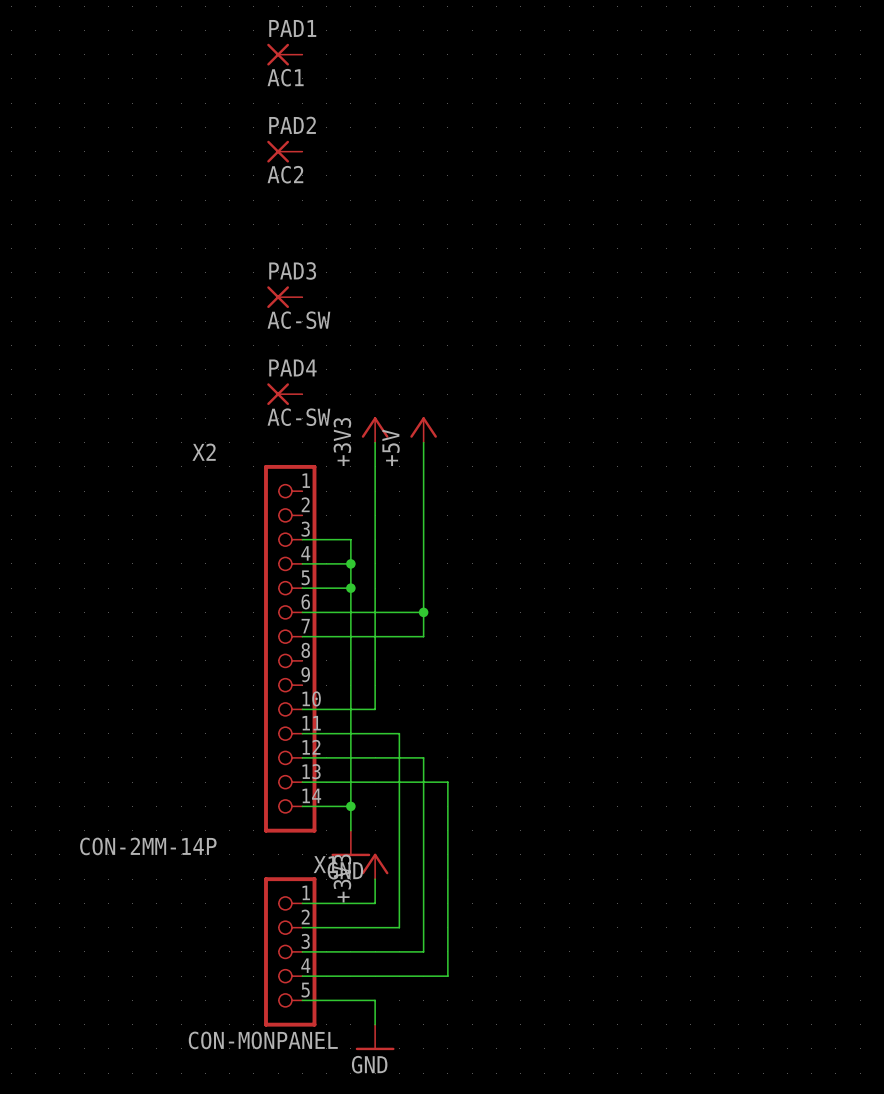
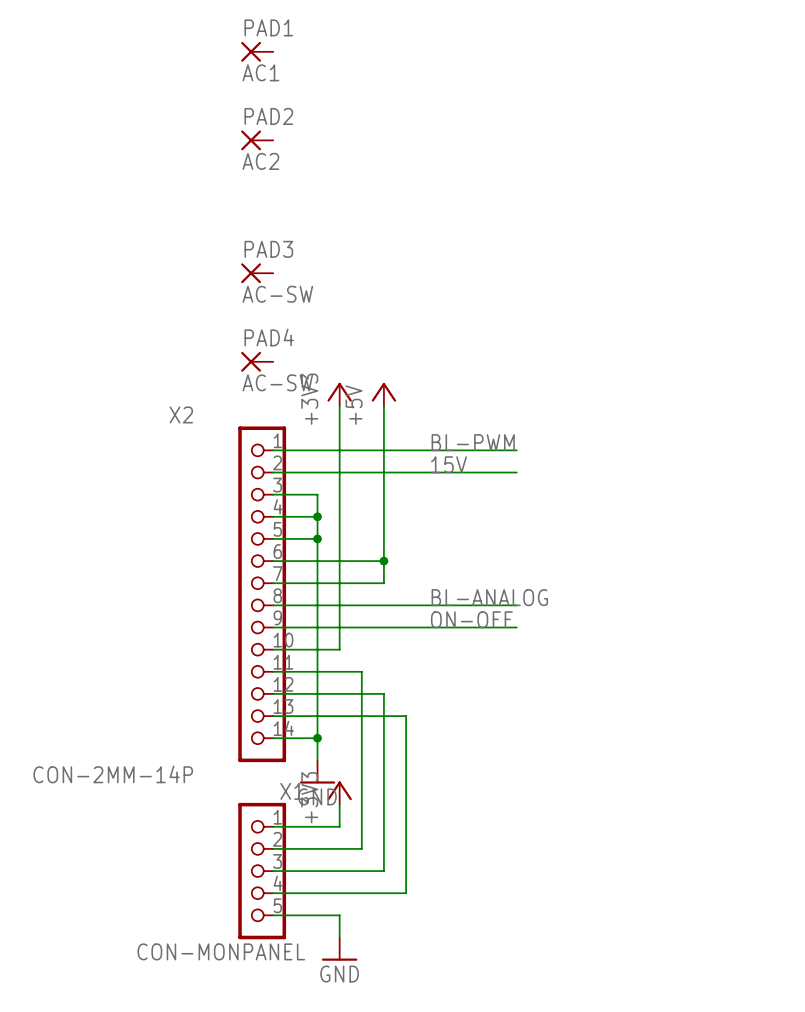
label: none -> BL-PWM (473, 442)
wire: none -> (273, 450) (516, 450)
label: none -> 15V (448, 464)
wire: none -> (273, 472) (516, 472)
label: none -> BL-ANALOG (489, 597)
wire: none -> (273, 605) (516, 605)
label: none -> ON-OFF (471, 619)
wire: none -> (273, 627) (516, 627)

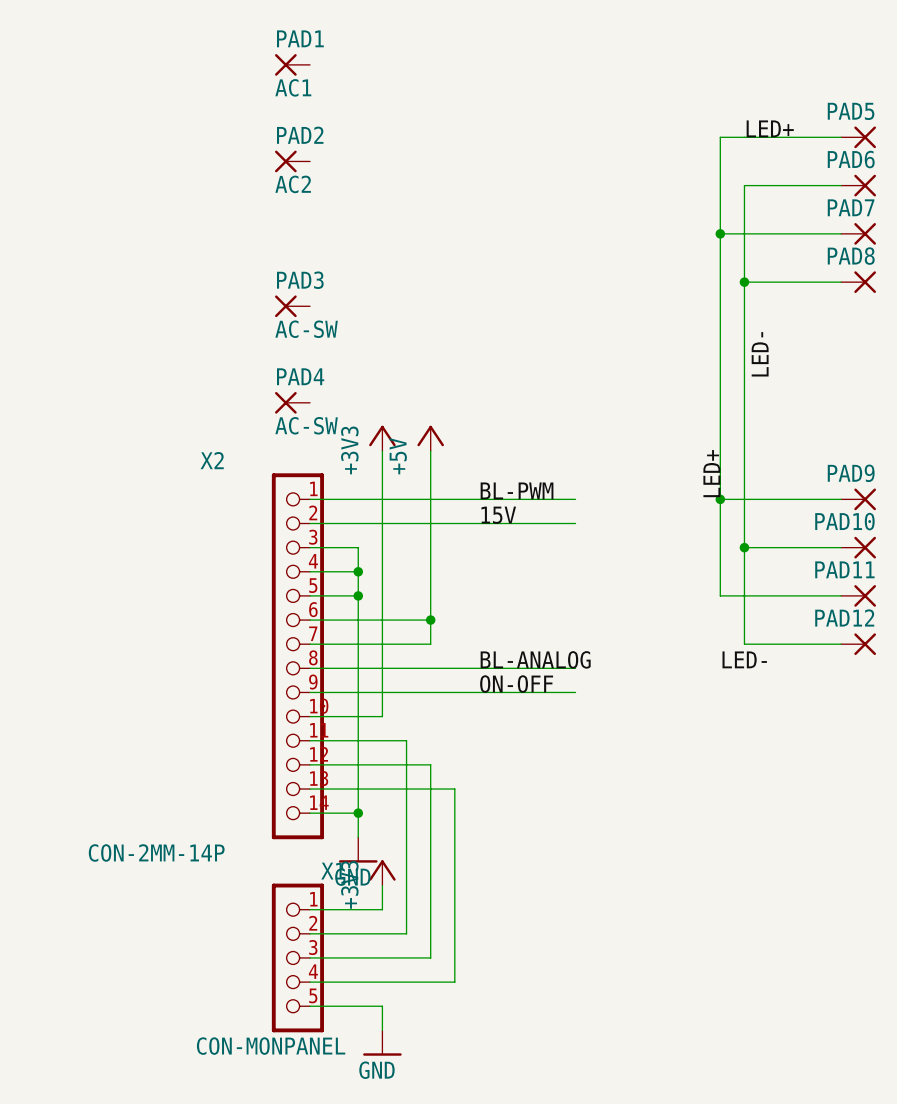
label: none -> LED+ (770, 128)
wire: none -> (841, 137) (720, 137) (720, 595) (841, 595)
PAD5: none -> (858, 137)
wire: none -> (841, 185) (744, 185) (744, 644) (841, 644)
PAD6: none -> (858, 185)
wire: none -> (720, 233) (841, 233)
junction: none -> (720, 233)
PAD7: none -> (858, 233)
wire: none -> (744, 282) (841, 282)
junction: none -> (744, 282)
PAD8: none -> (858, 282)
label: none -> LED- (760, 354)
label: none -> LED+ (711, 473)
wire: none -> (720, 499) (841, 499)
junction: none -> (720, 499)
PAD9: none -> (858, 499)
wire: none -> (744, 547) (841, 547)
junction: none -> (744, 547)
PAD10: none -> (858, 547)
PAD11: none -> (858, 595)
PAD12: none -> (858, 644)
label: none -> LED- (744, 659)

